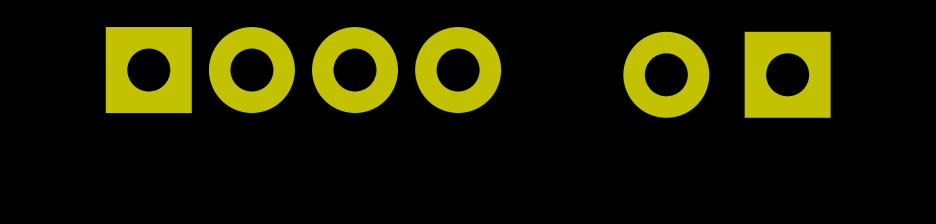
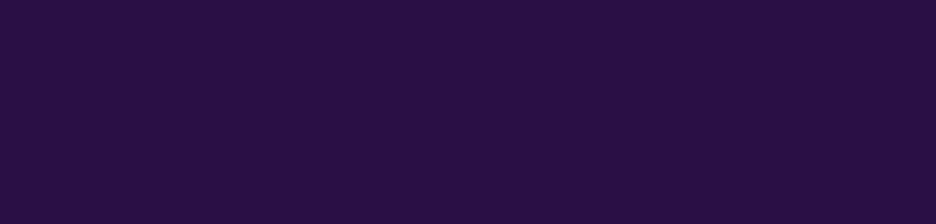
part: (303, 70) -> none
part: (726, 74) -> none

